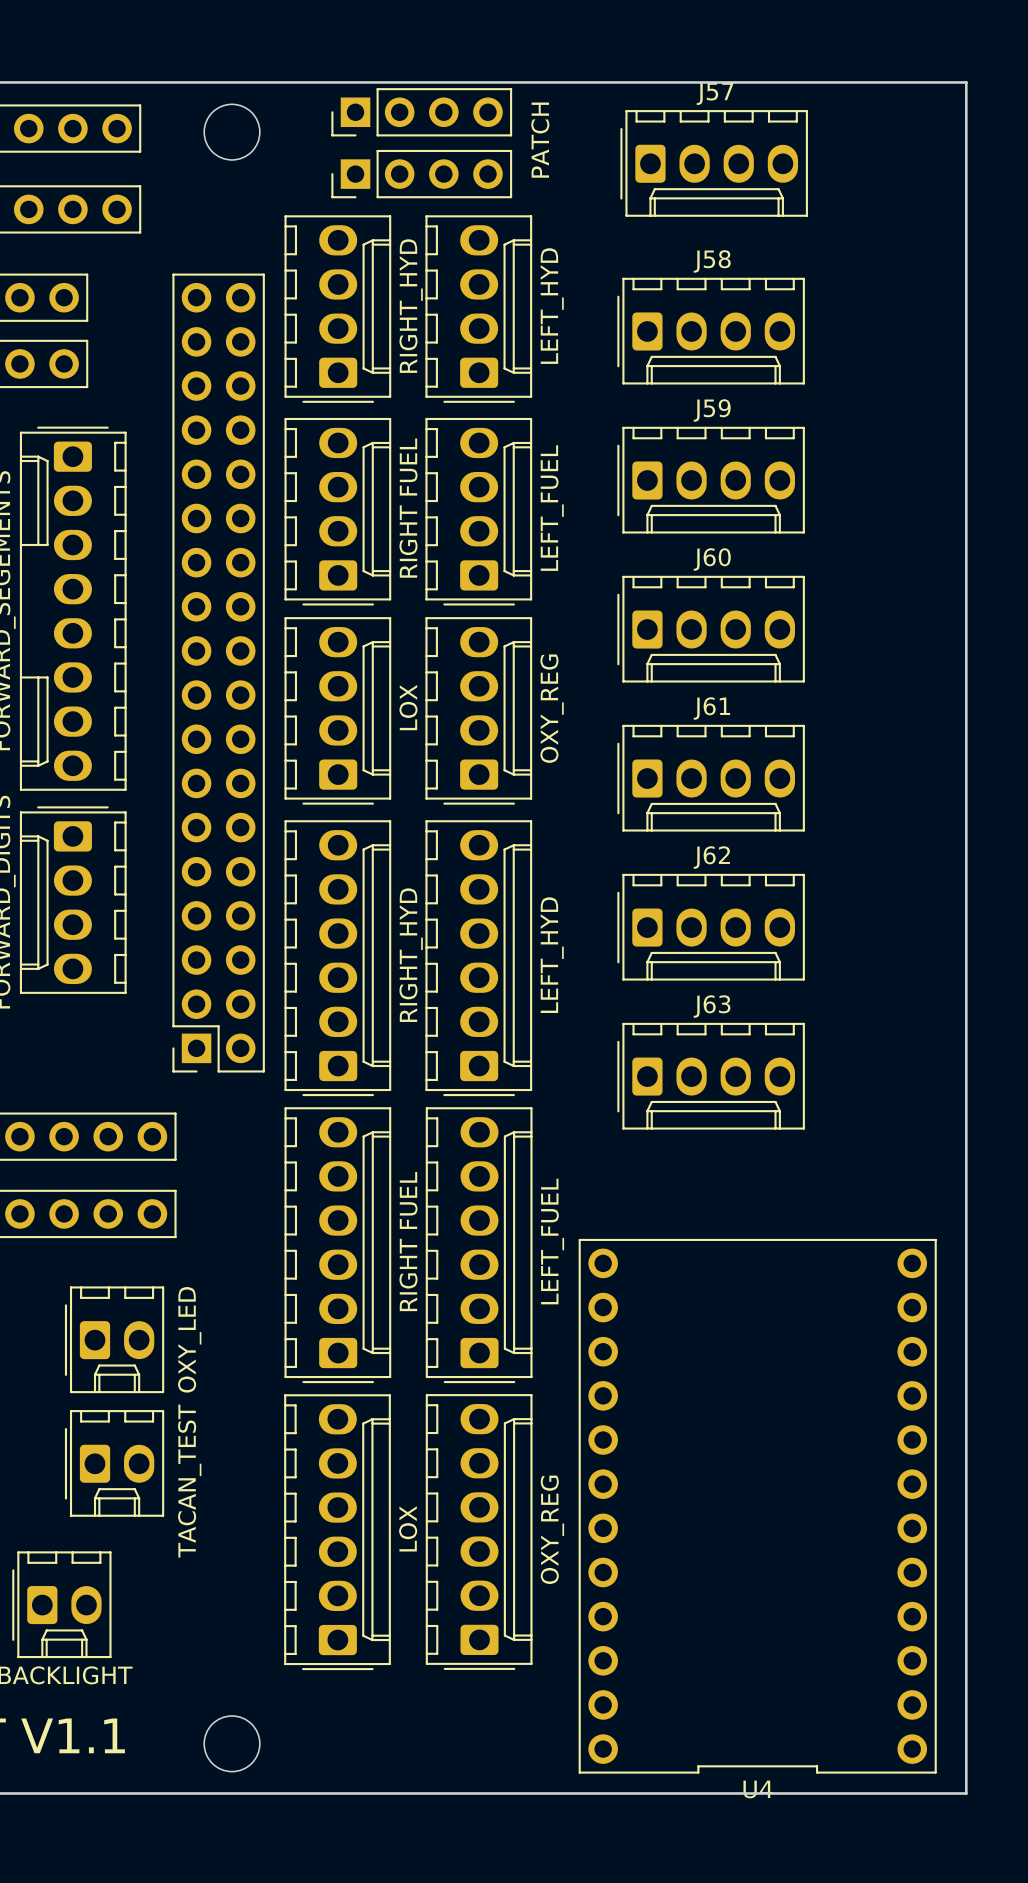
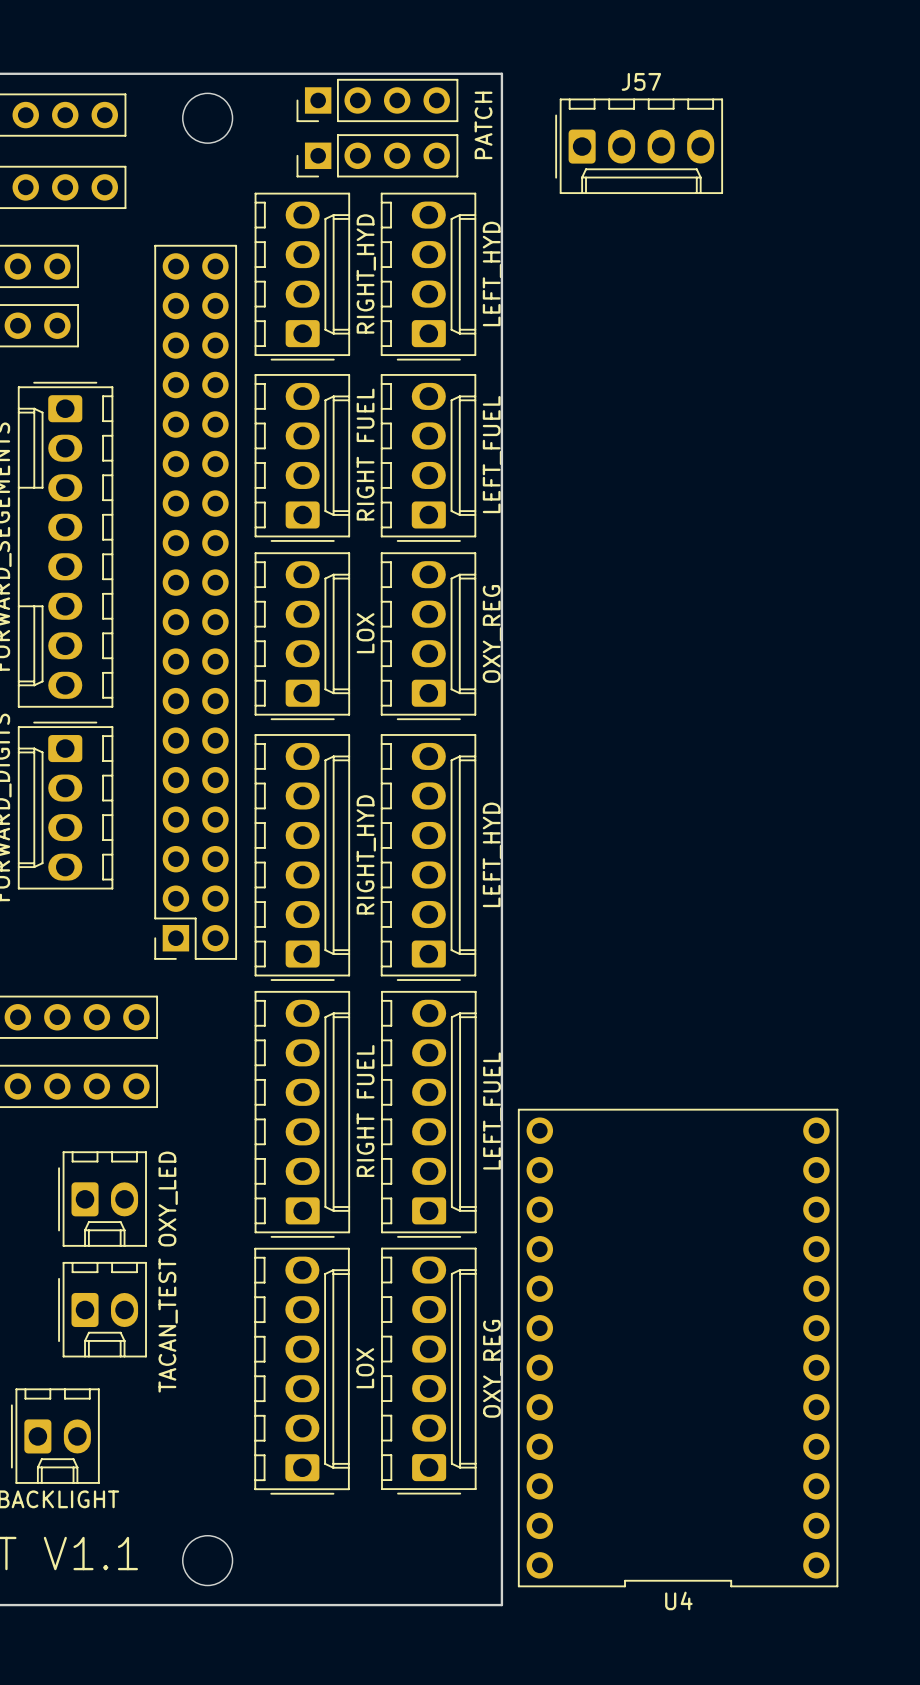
board edge: (560, 82) (966, 82) (966, 1793) (560, 1793) -> (501, 73) (501, 1605)
J58: (711, 331) -> none
J59: (711, 480) -> none
J60: (711, 629) -> none
J61: (711, 778) -> none
J62: (711, 927) -> none
J63: (711, 1076) -> none

